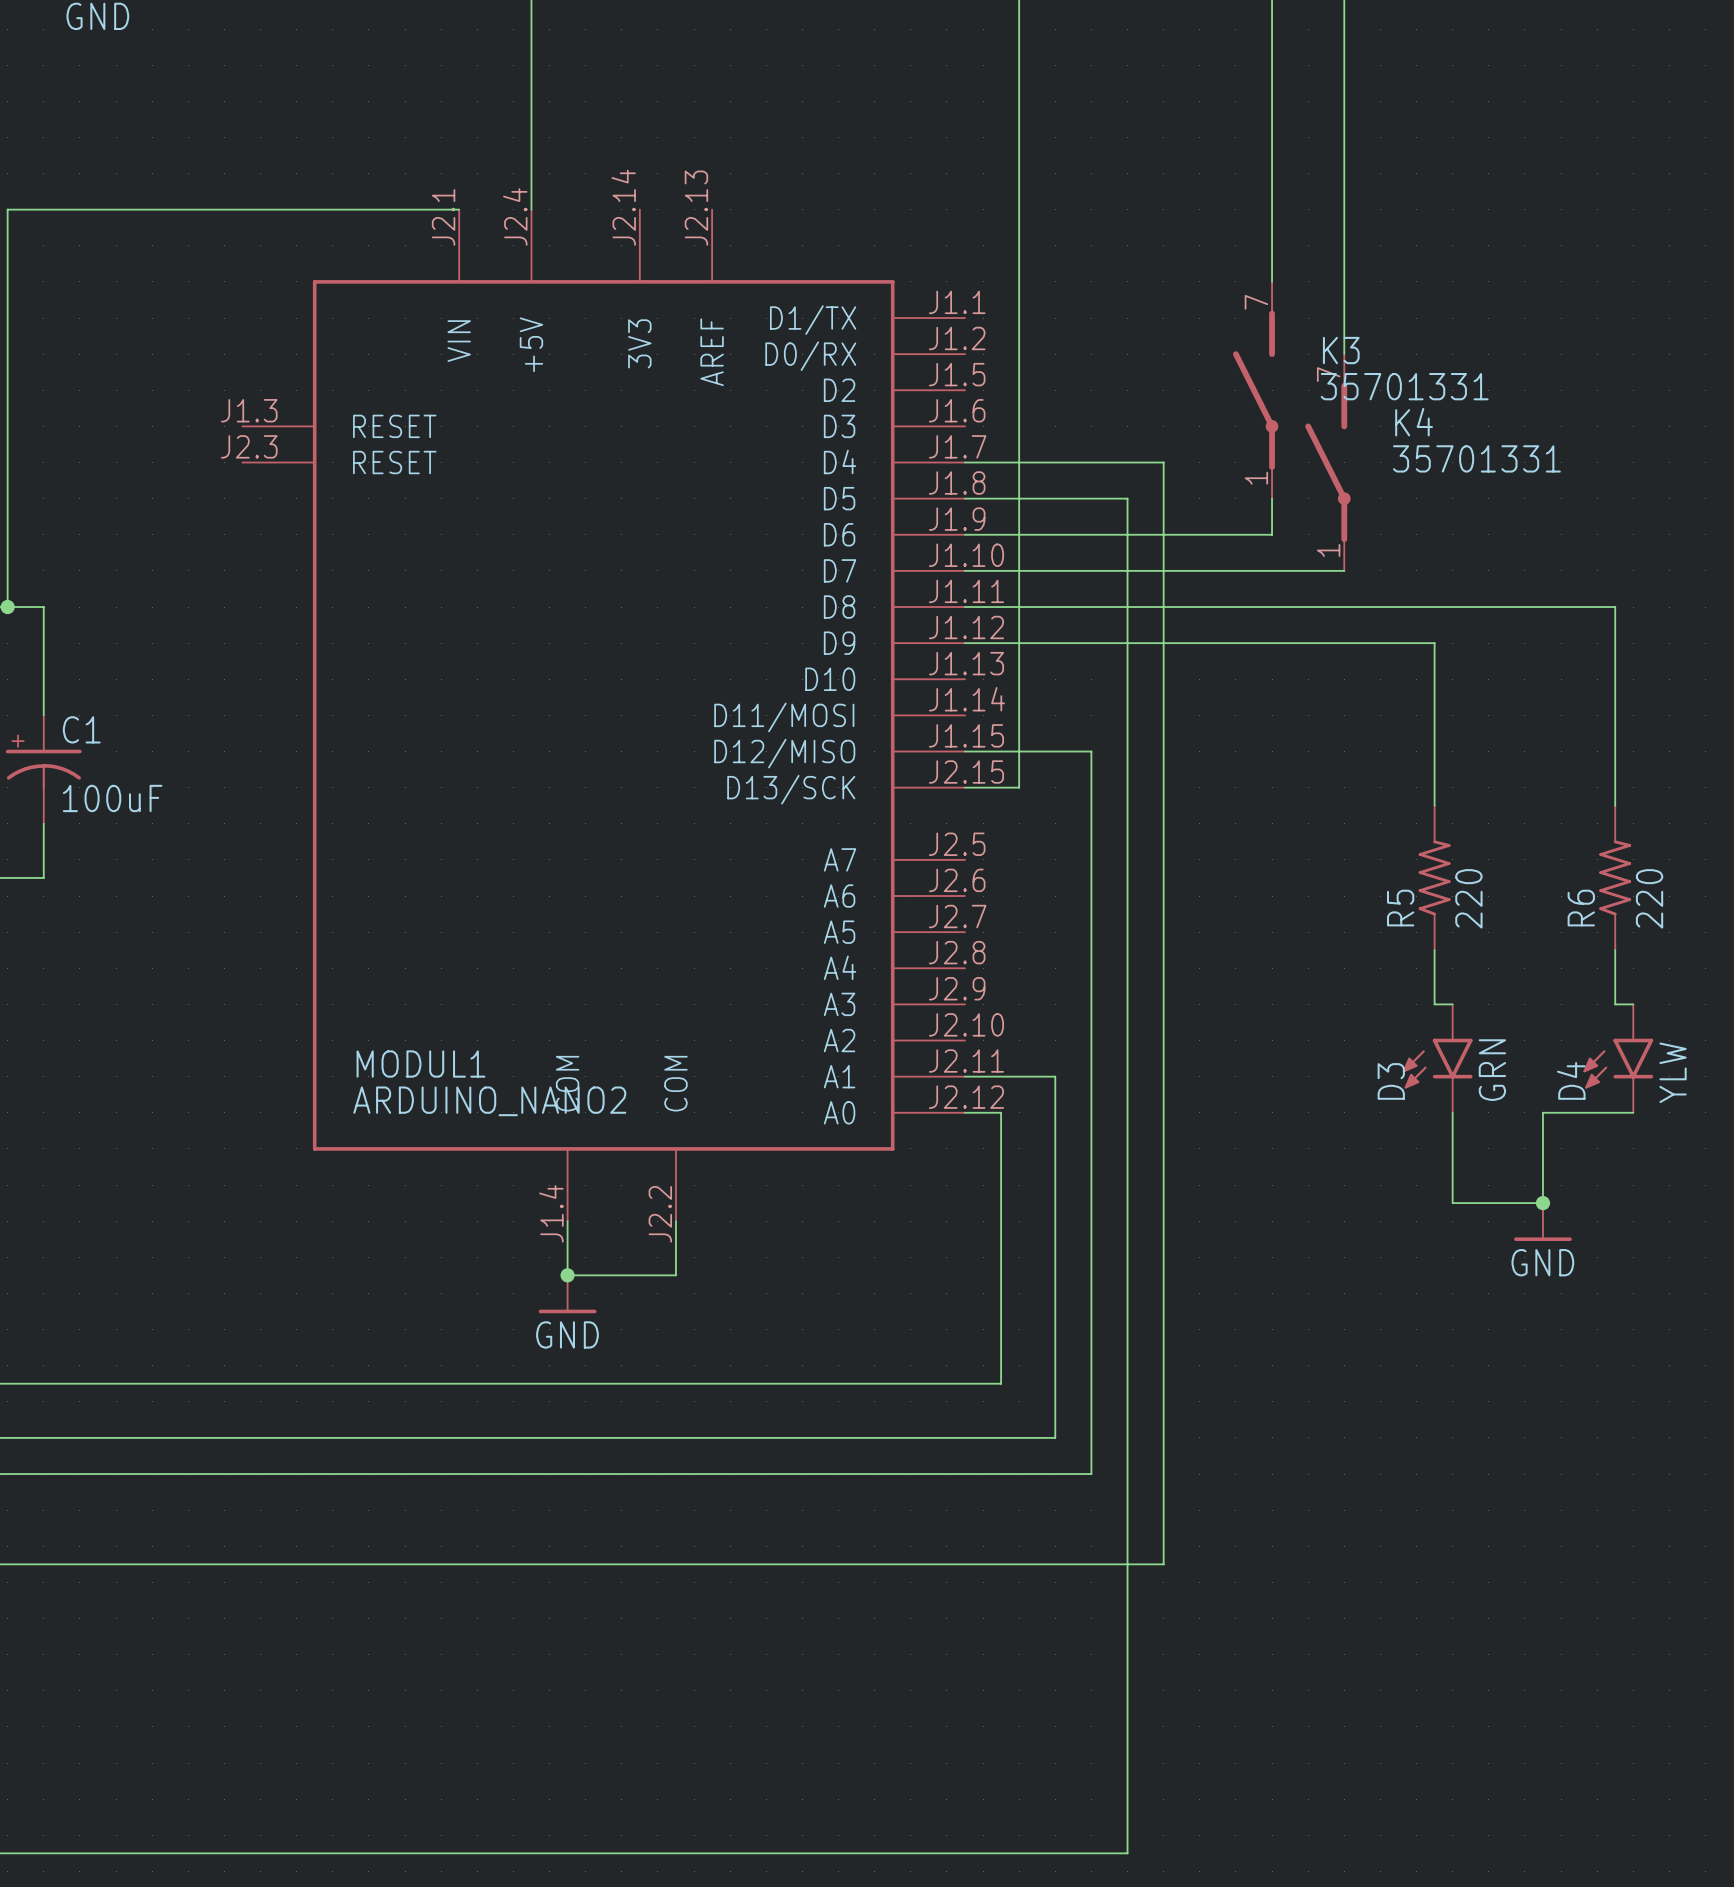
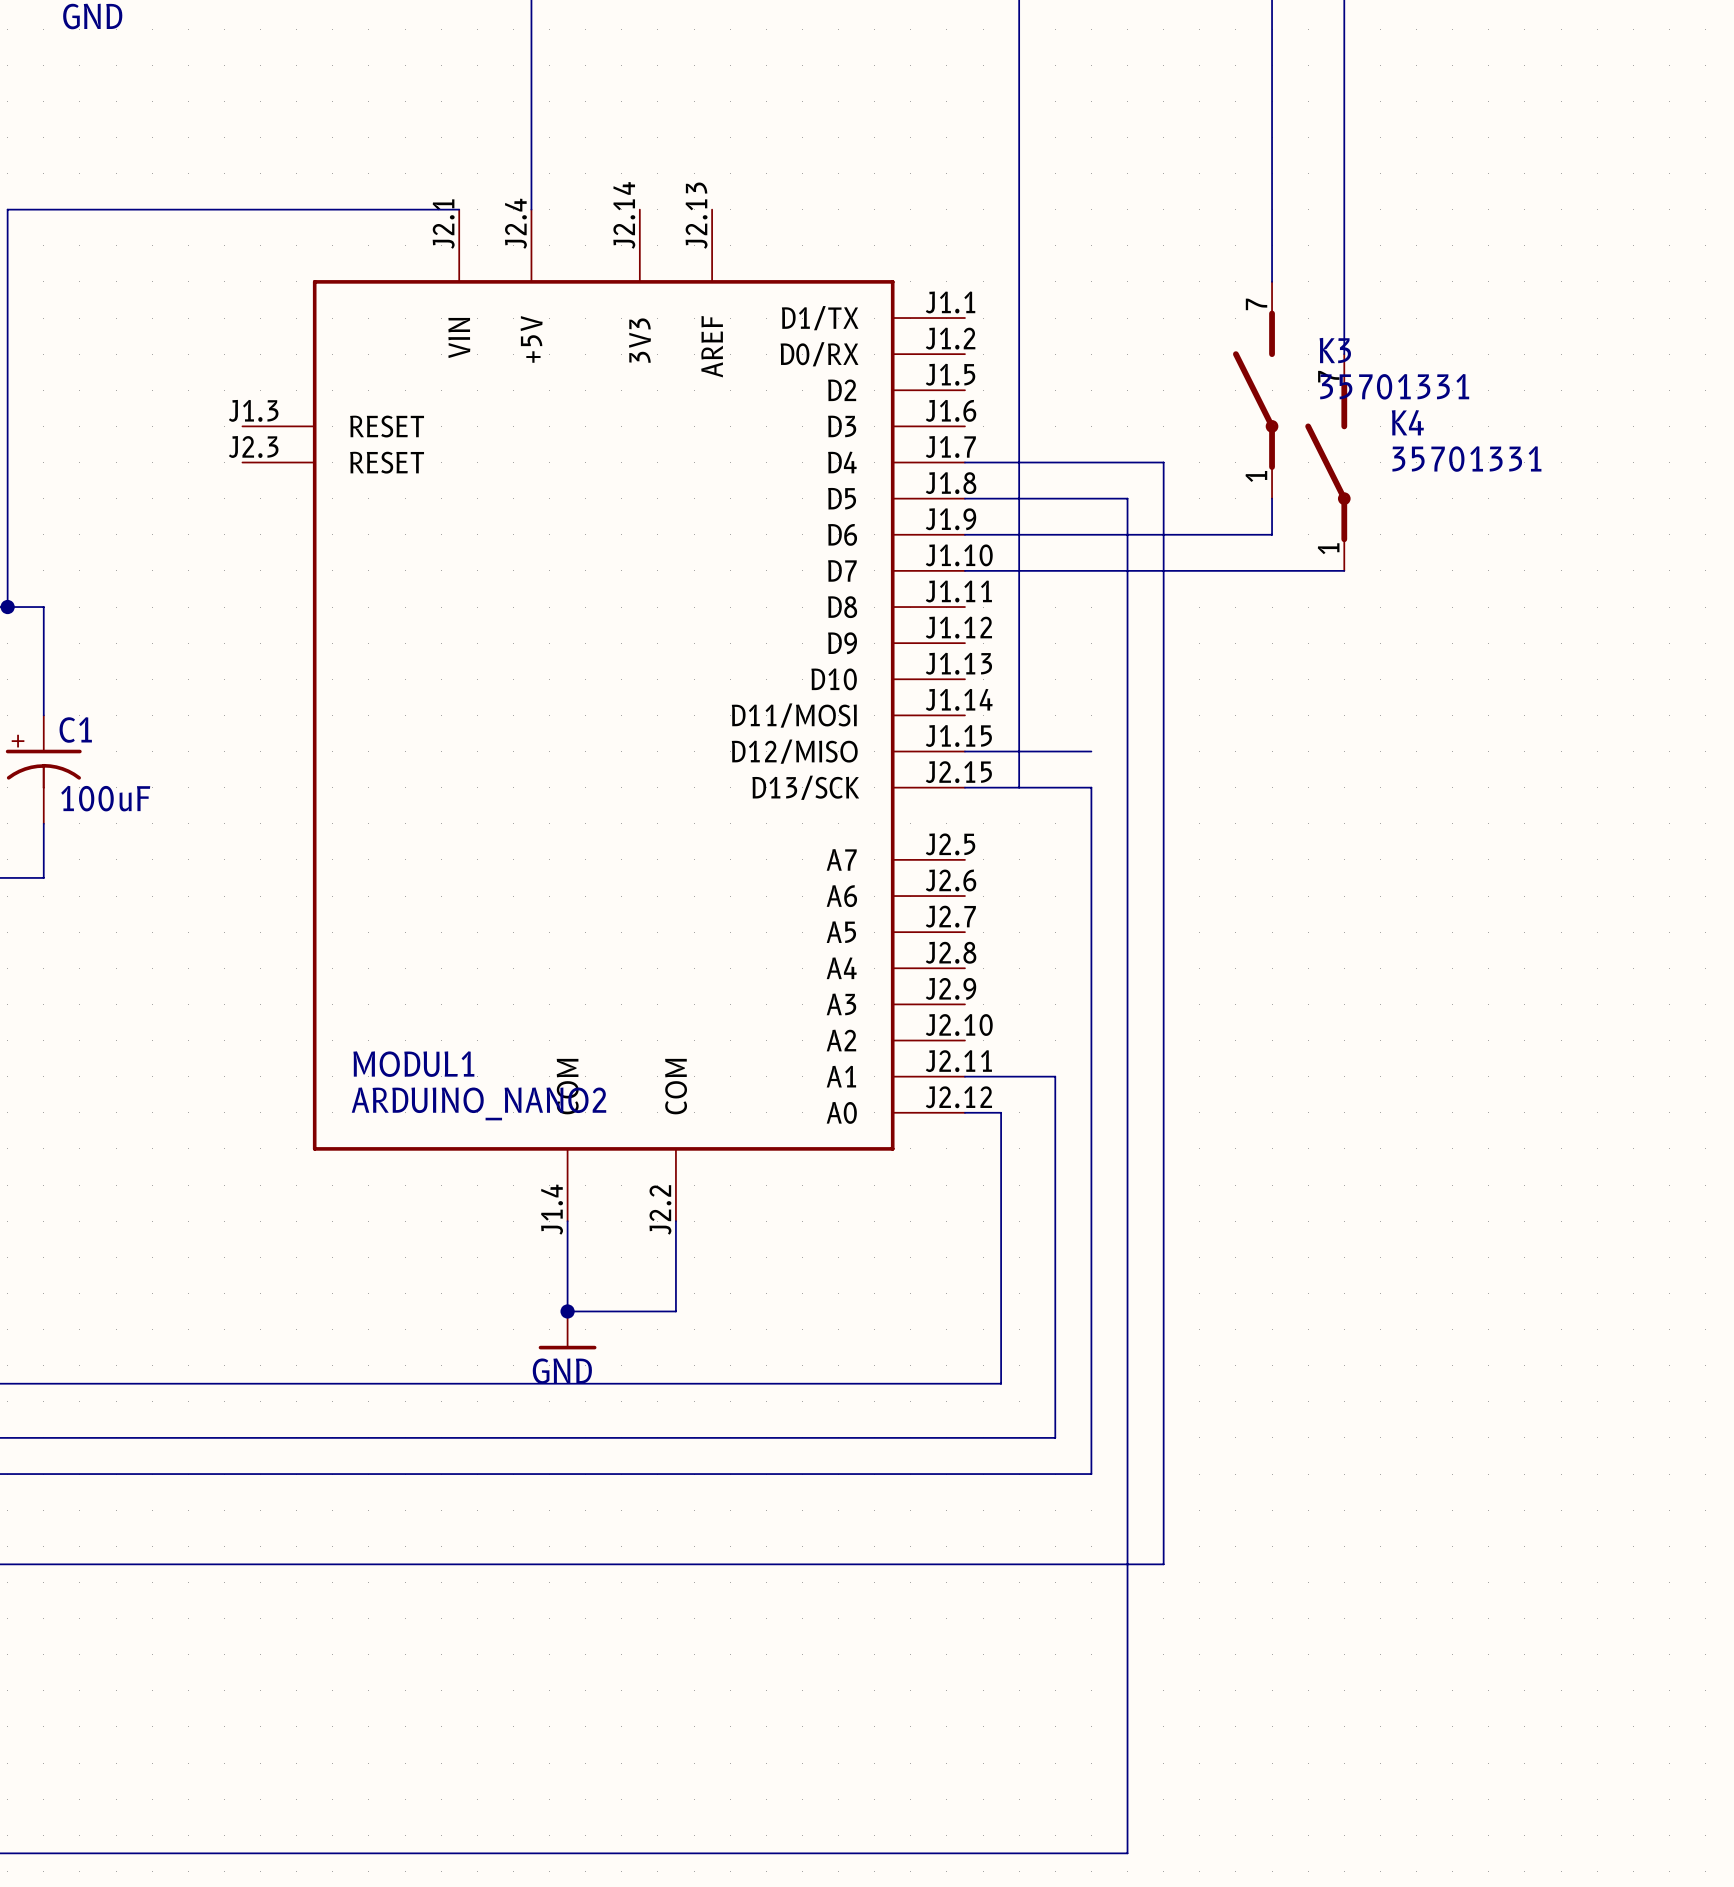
wire: (964, 607) (1615, 607) (1615, 805) -> none
wire: (964, 643) (1434, 643) (1434, 805) -> none
wire: (1091, 751) (1091, 787) -> (1019, 787) (1091, 787)
R5: 220 (1434, 877) -> none
R6: 220 (1615, 877) -> none
wire: (1434, 950) (1434, 1004) (1452, 1004) -> none
wire: (1615, 950) (1615, 1004) (1633, 1004) -> none
D3: GRN (1437, 1058) -> none
D4: YLW (1618, 1058) -> none
wire: (1452, 1112) (1452, 1203) (1542, 1203) (1542, 1112) (1633, 1112) -> none
junction: (1542, 1203) -> none
power symbol: GND (1542, 1222) -> none
wire: (567, 1275) (675, 1275) -> (567, 1275) (567, 1311) (675, 1311) (675, 1275)
junction position: (567, 1275) -> (567, 1311)
power symbol position: GND (567, 1294) -> GND (567, 1330)

